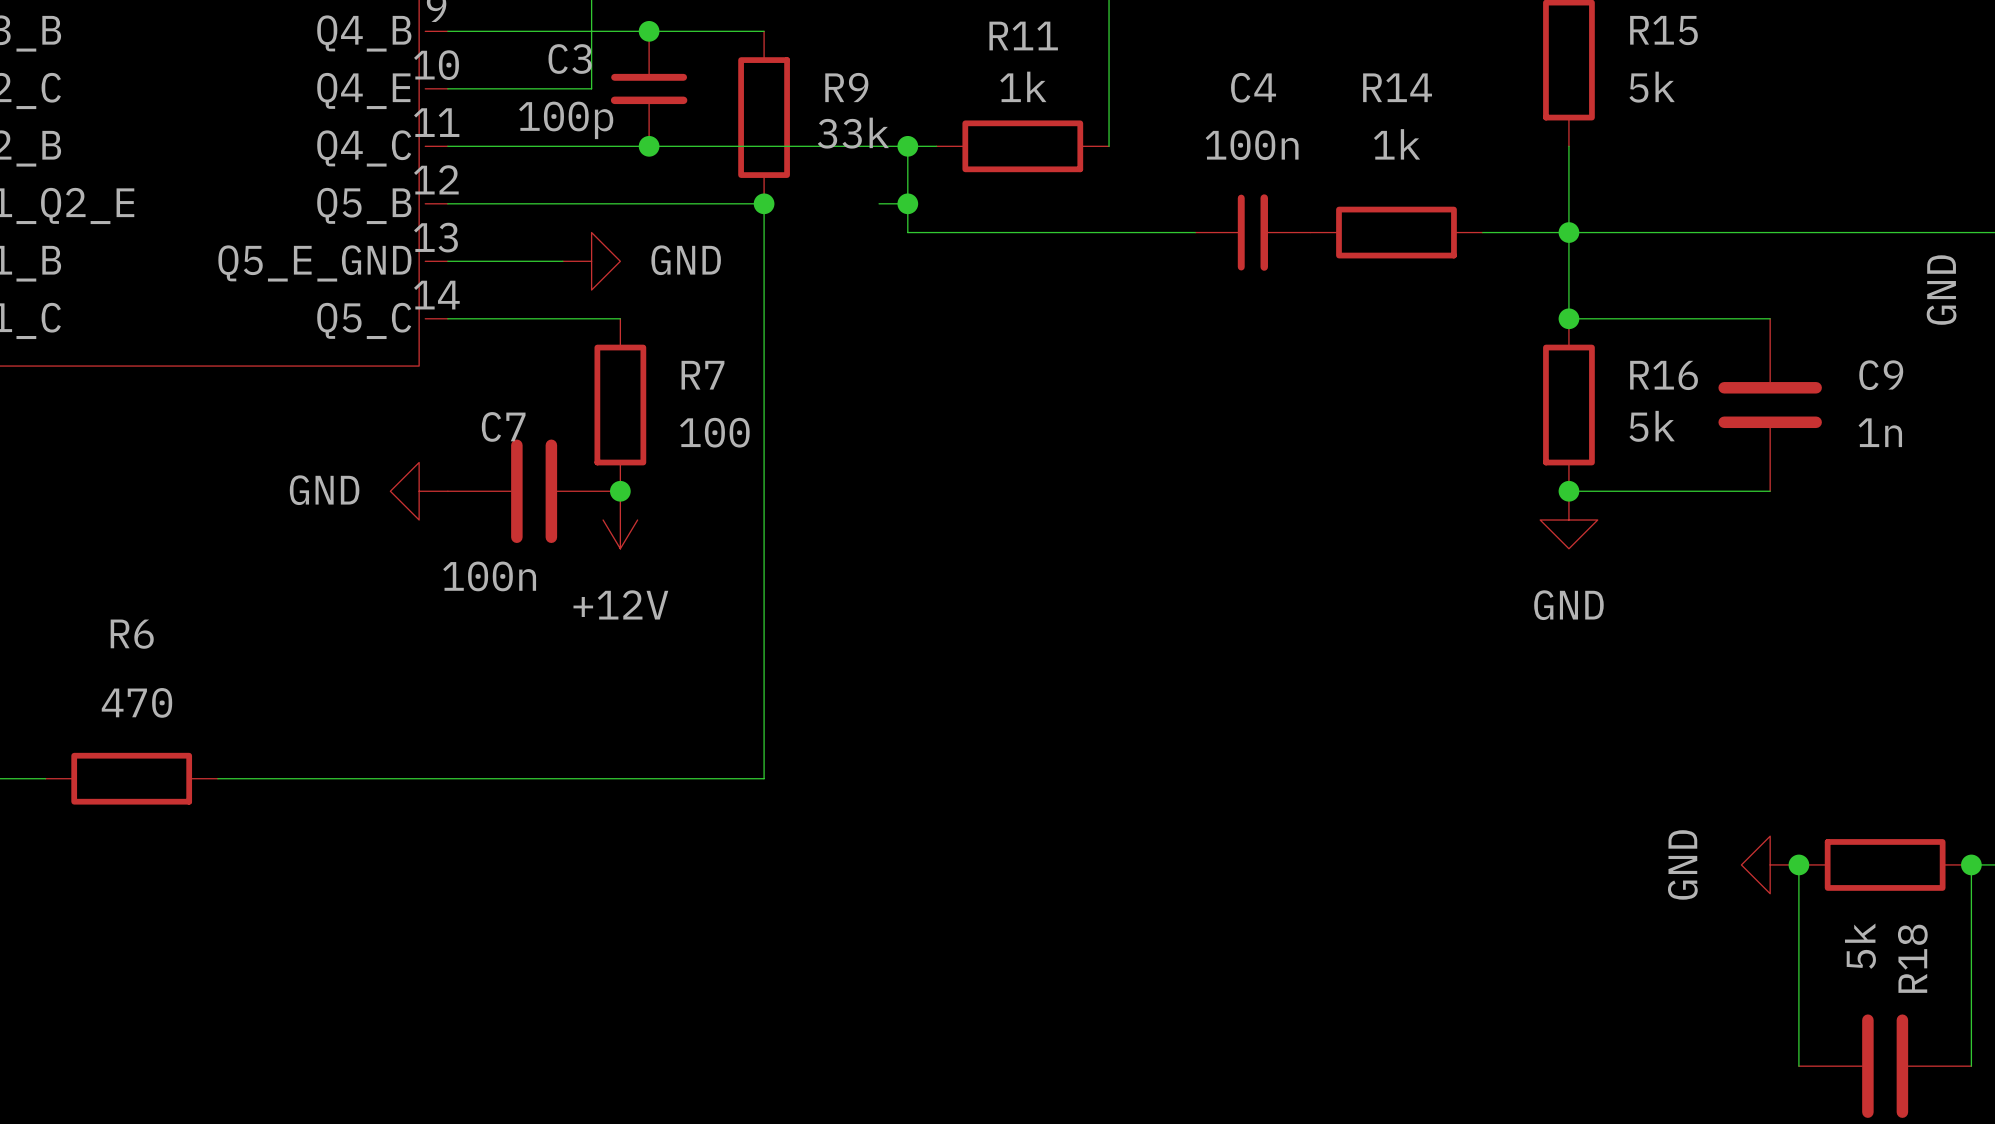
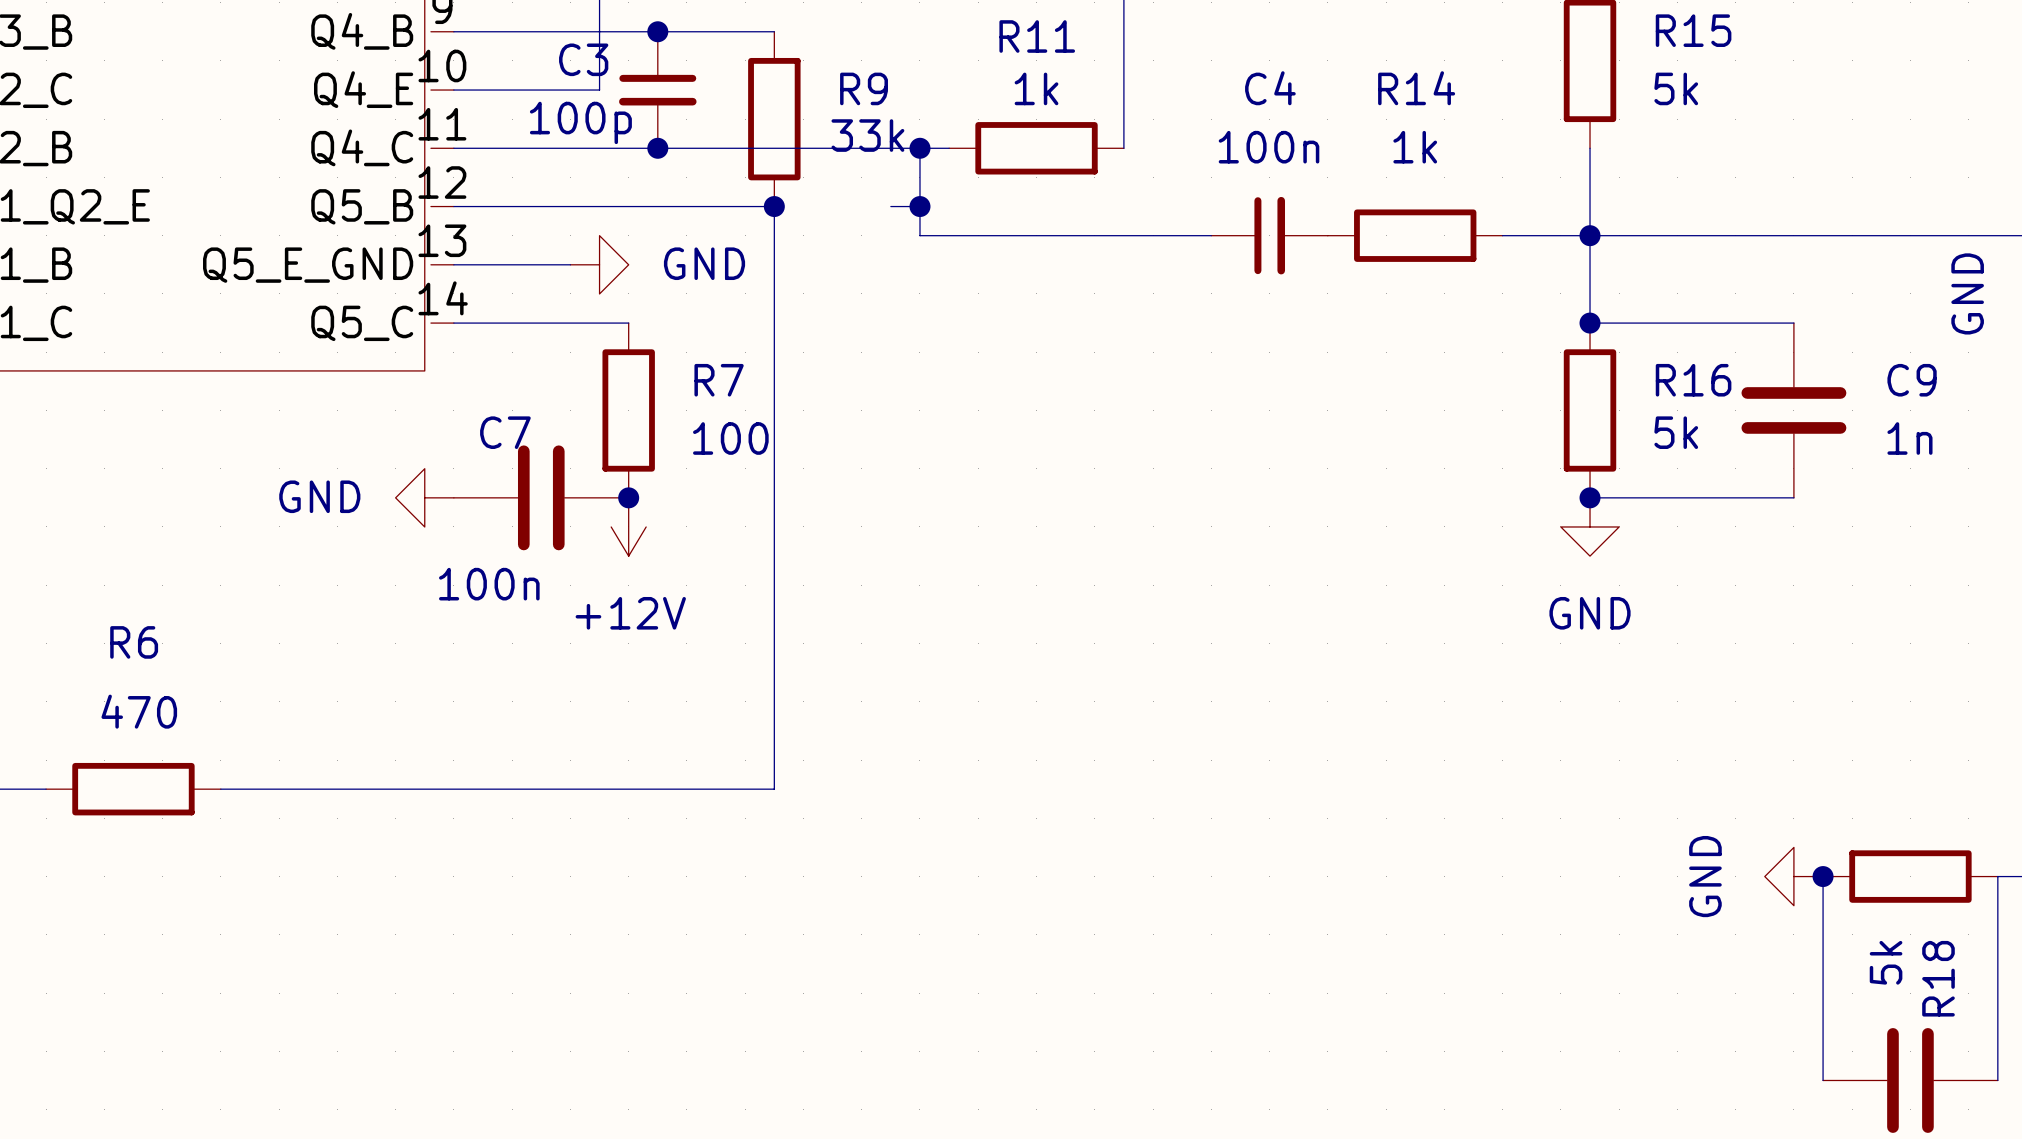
junction: (1971, 864) -> none

